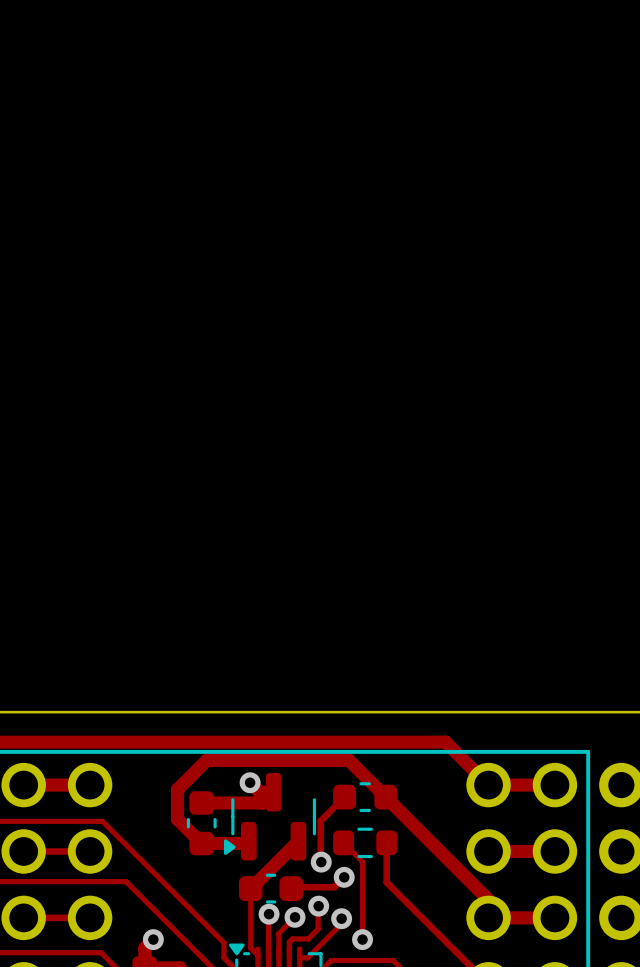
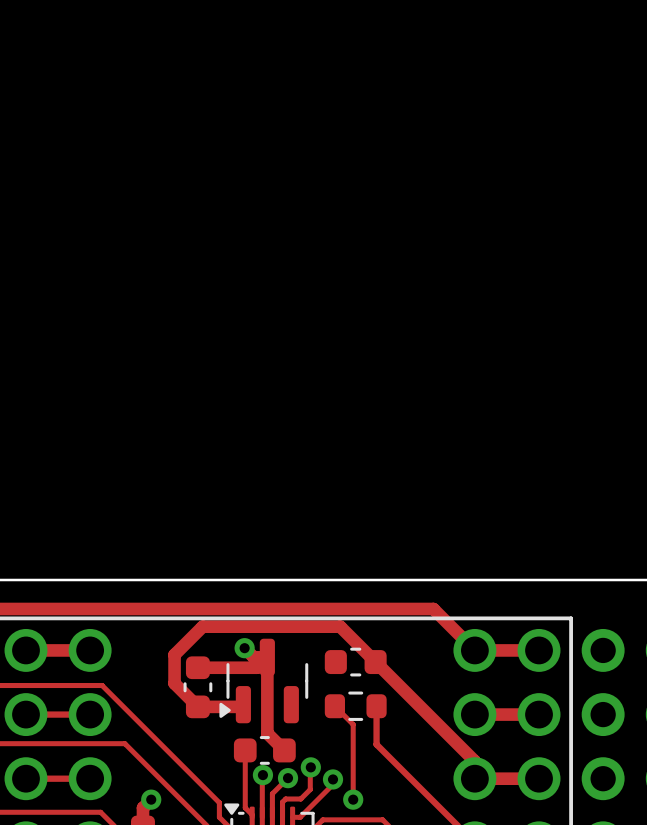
track: (344, 797) (320, 820) (321, 862) -> none
track: (298, 841) (251, 888) -> none
via: (321, 862) -> none
track: (344, 877) (334, 887) (291, 888) -> (267, 657) (267, 733) (284, 750)
via: (344, 877) -> none

